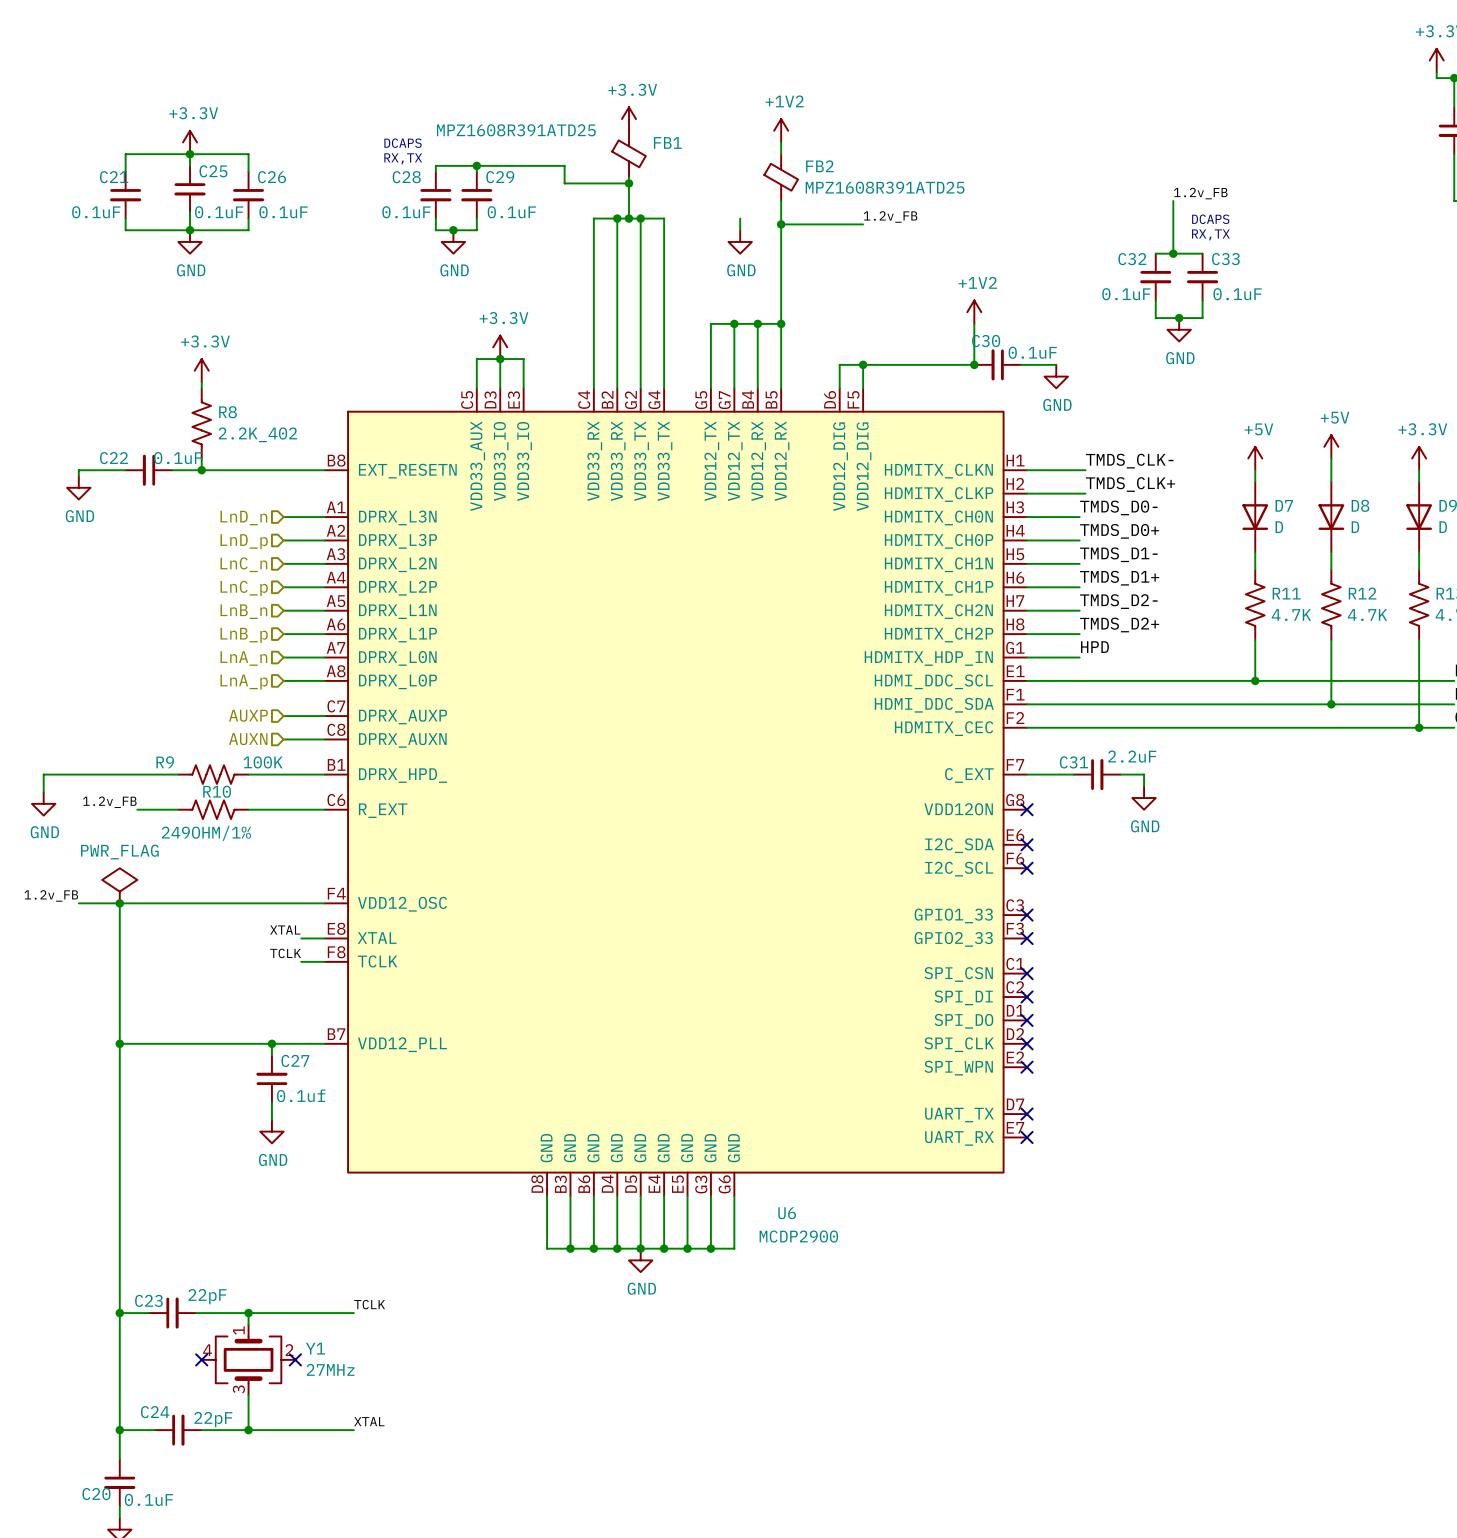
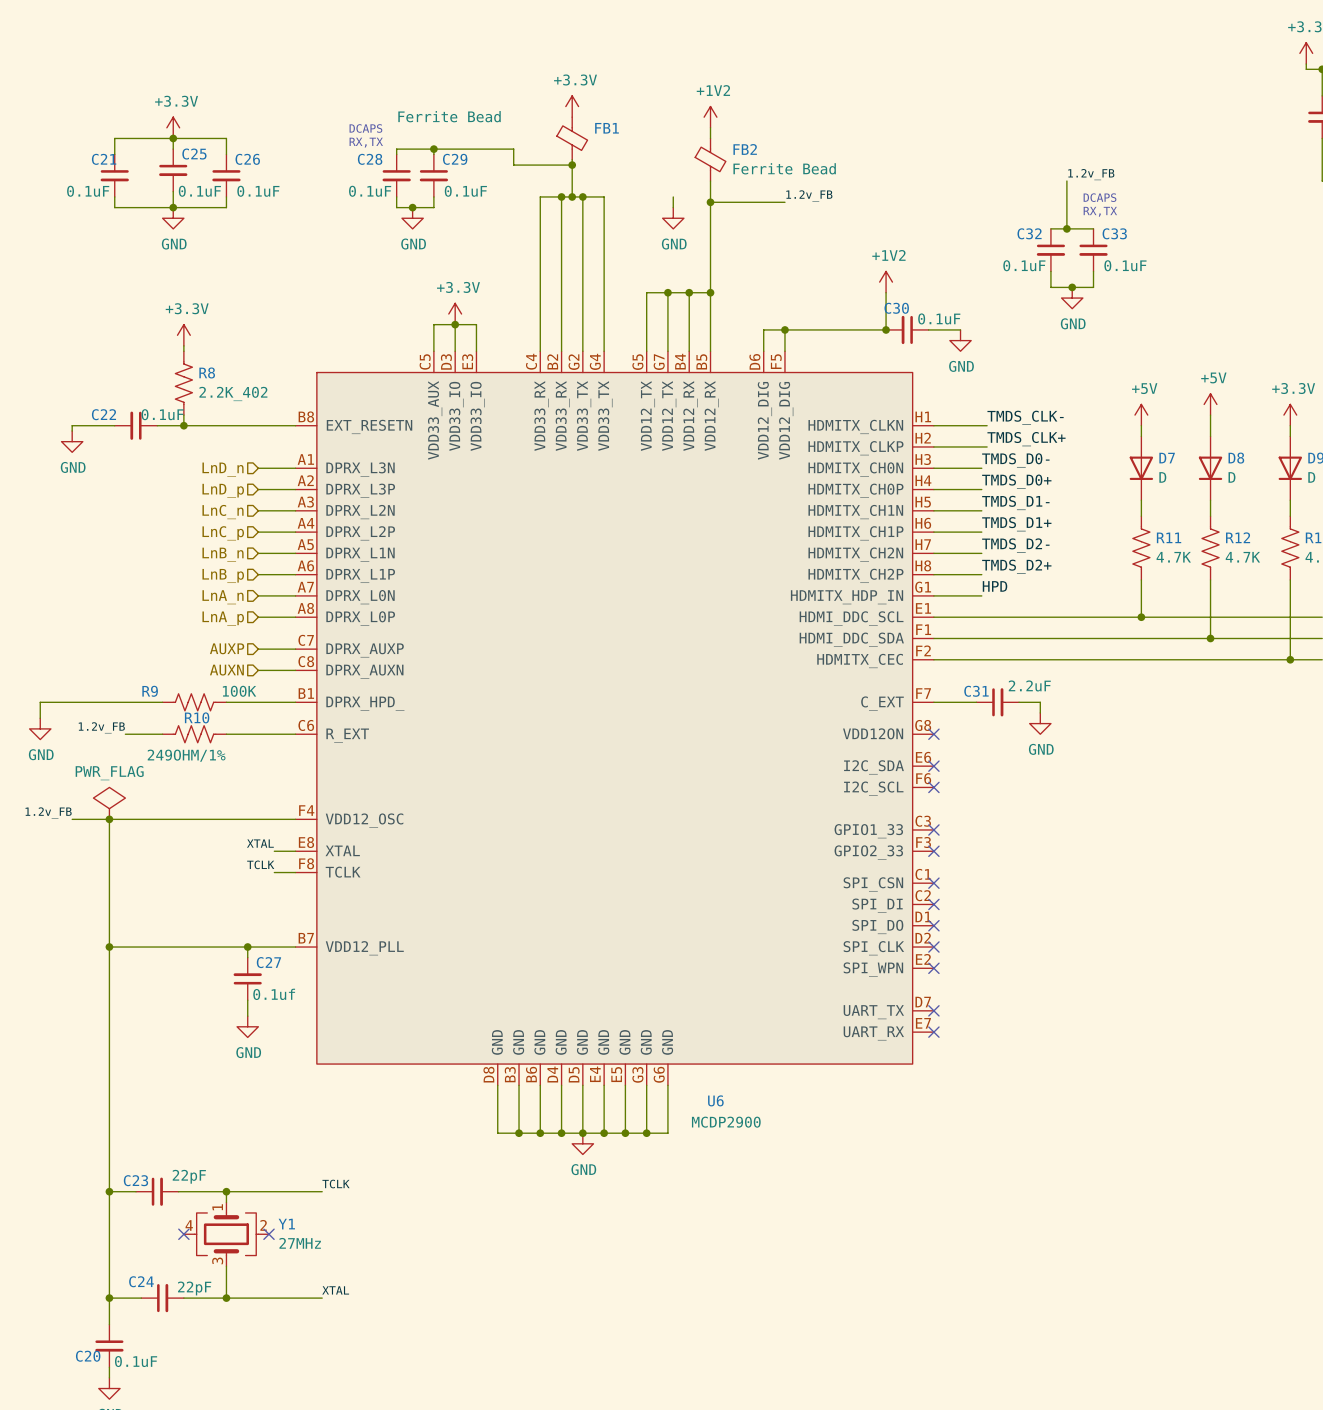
FB1 value: MPZ1608R391ATD25 (516, 130) -> Ferrite Bead (449, 116)
FB2 value: MPZ1608R391ATD25 (885, 187) -> Ferrite Bead (784, 168)

